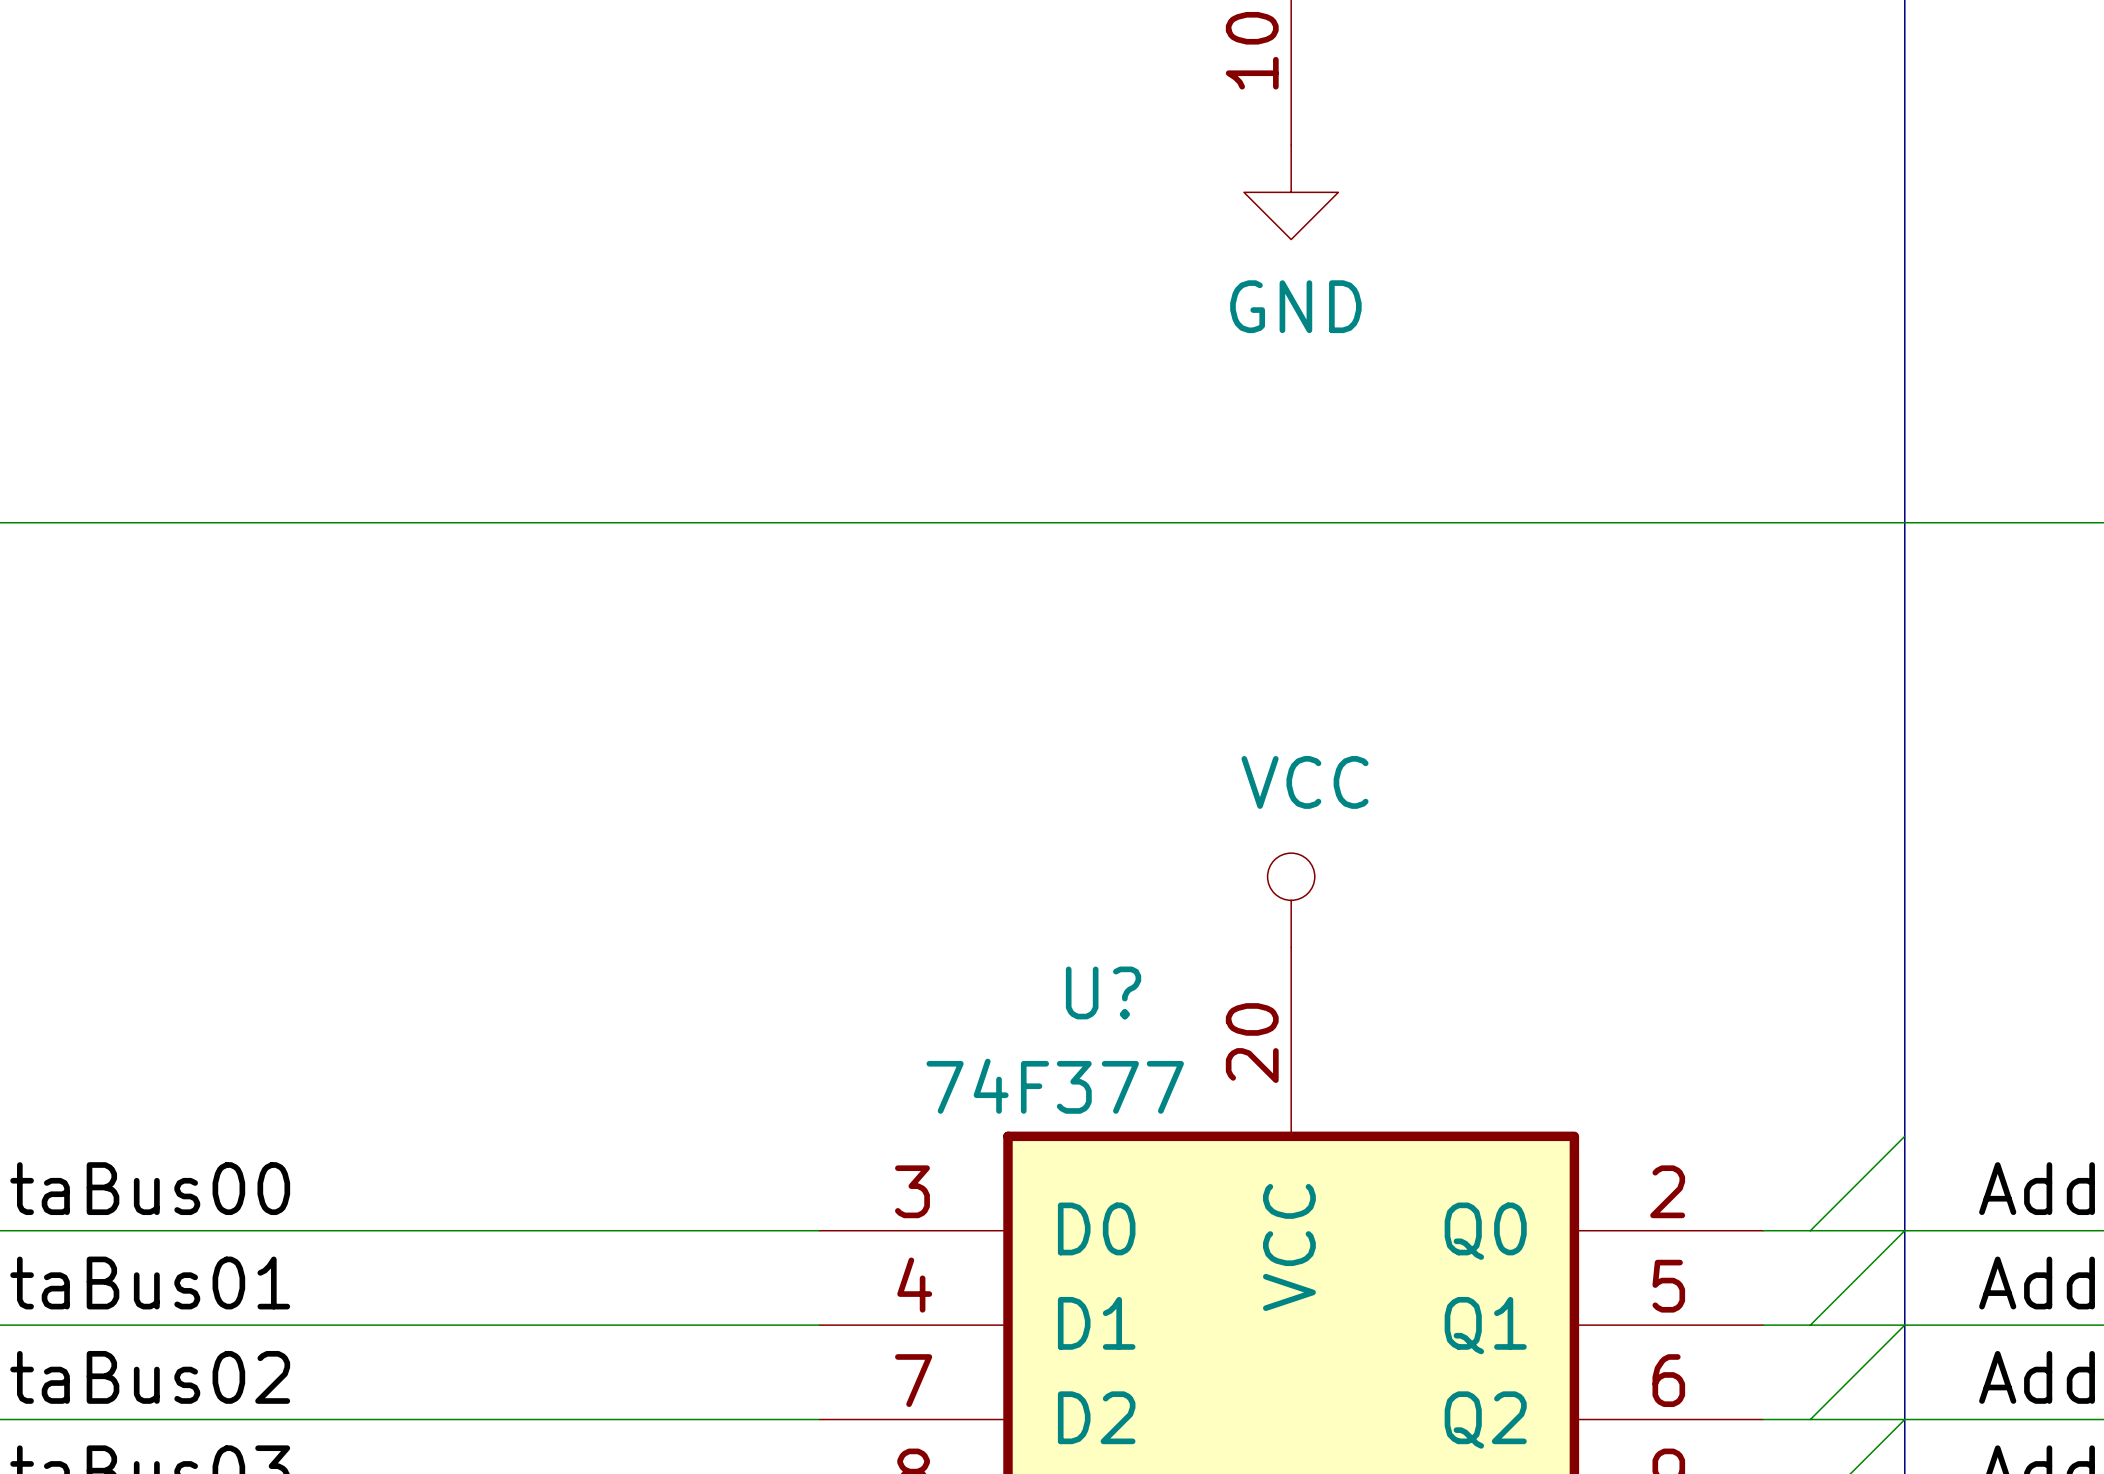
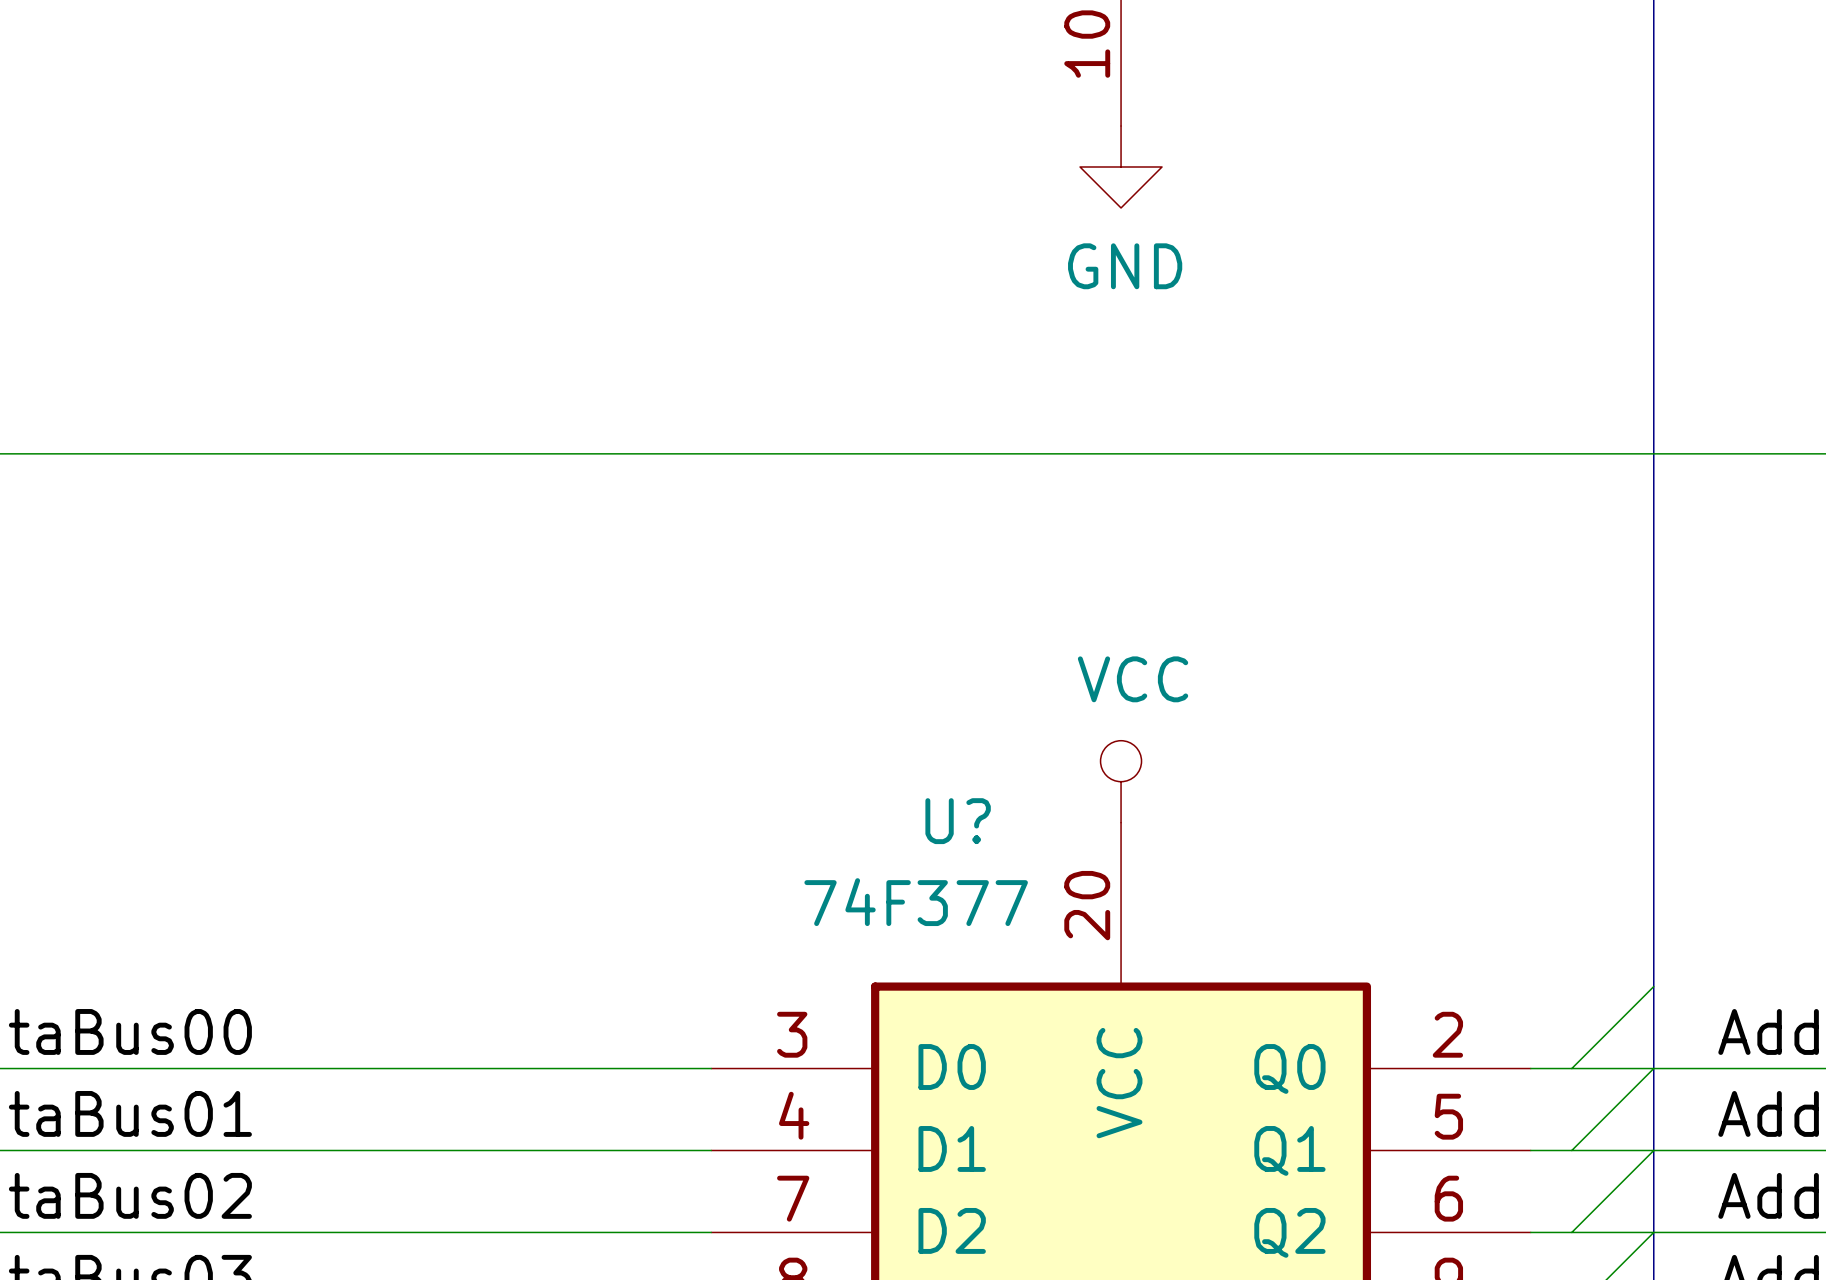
U? name position: U? (1103, 992) -> U? (958, 821)
U? value position: 74F377 (1055, 1086) -> 74F377 (916, 902)

